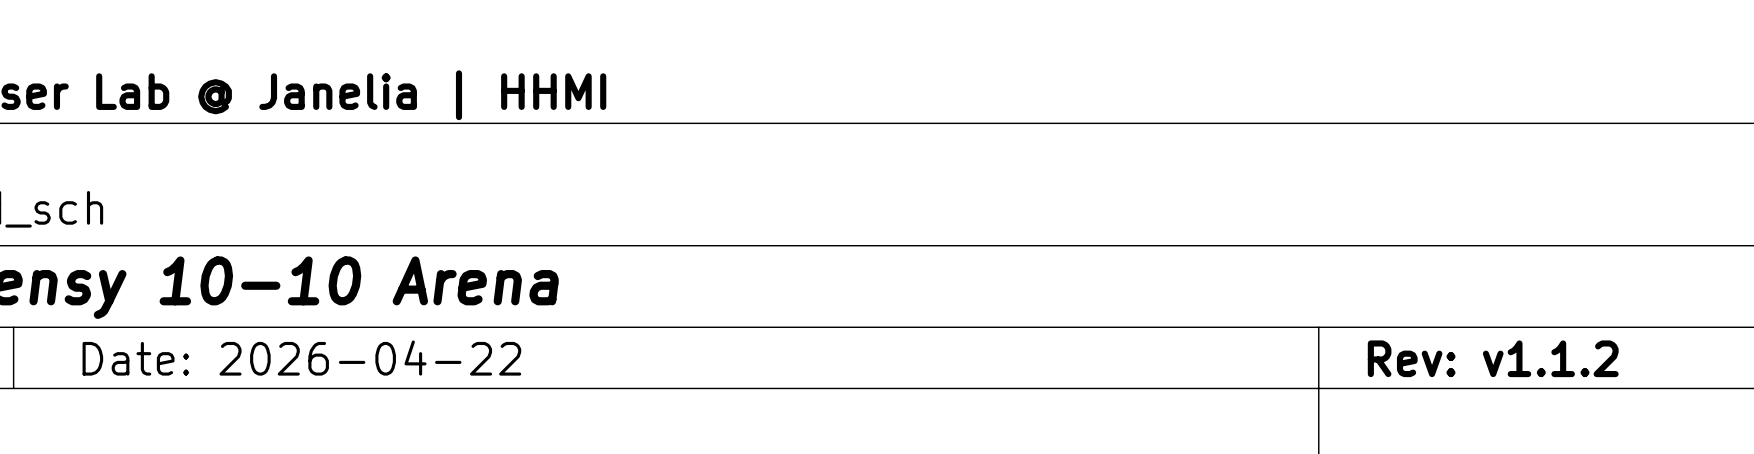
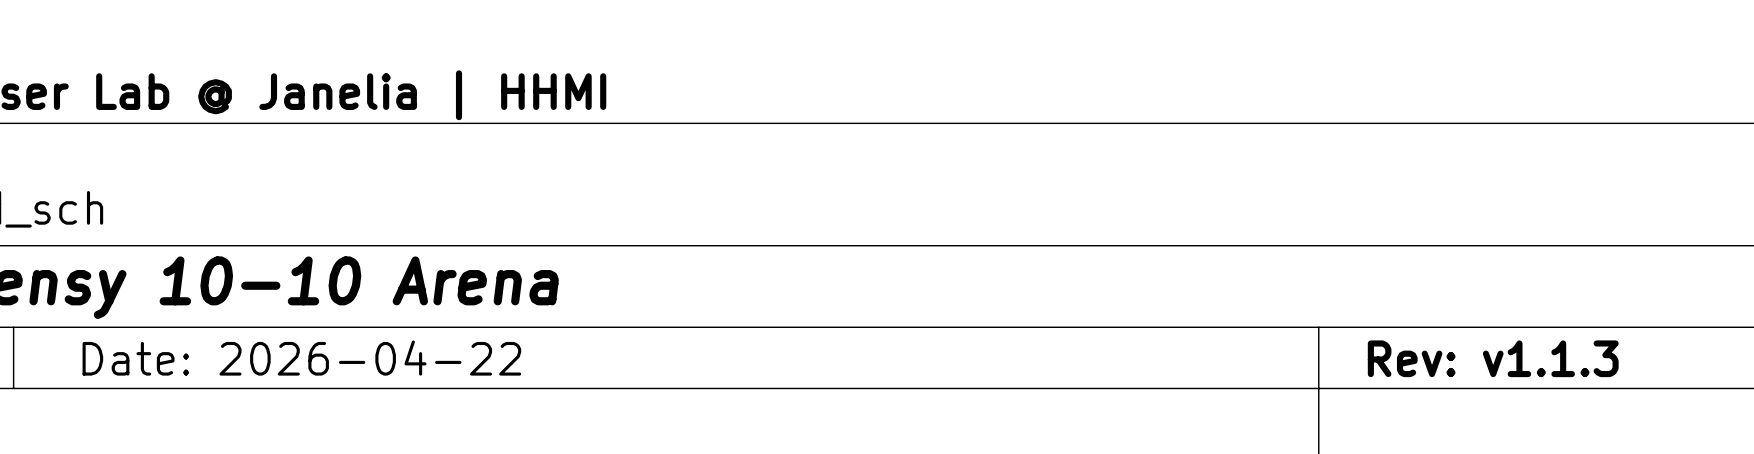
title block: Rev: v1.1.2 (1493, 358) -> Rev: v1.1.3 (1493, 358)

